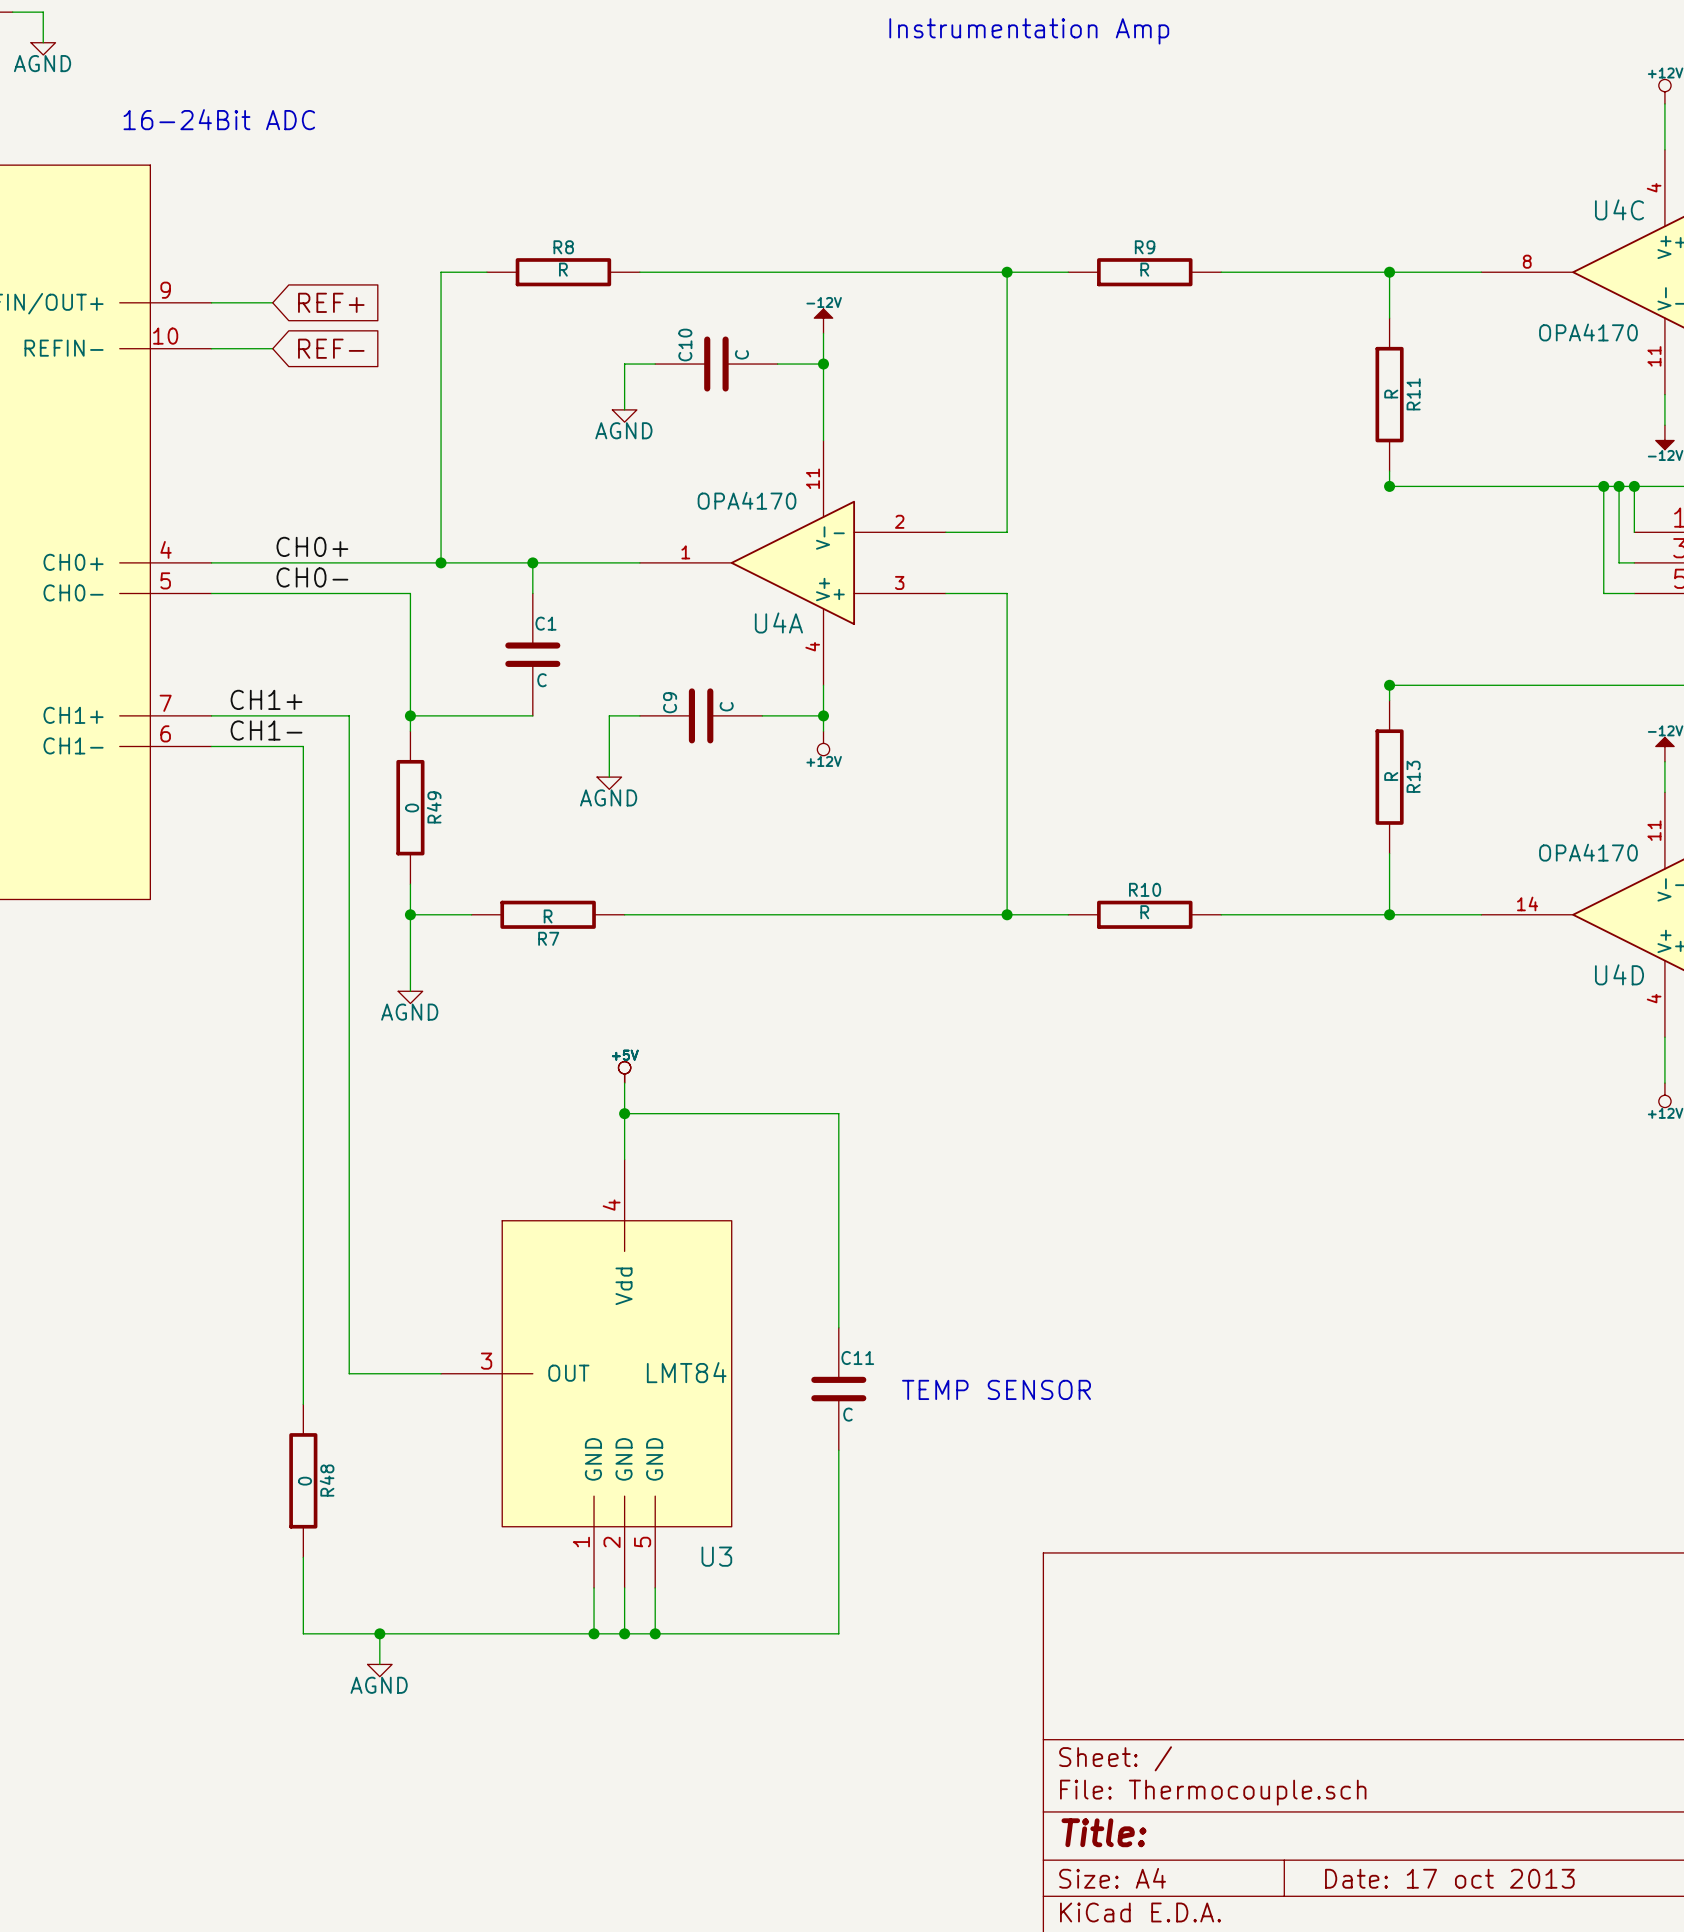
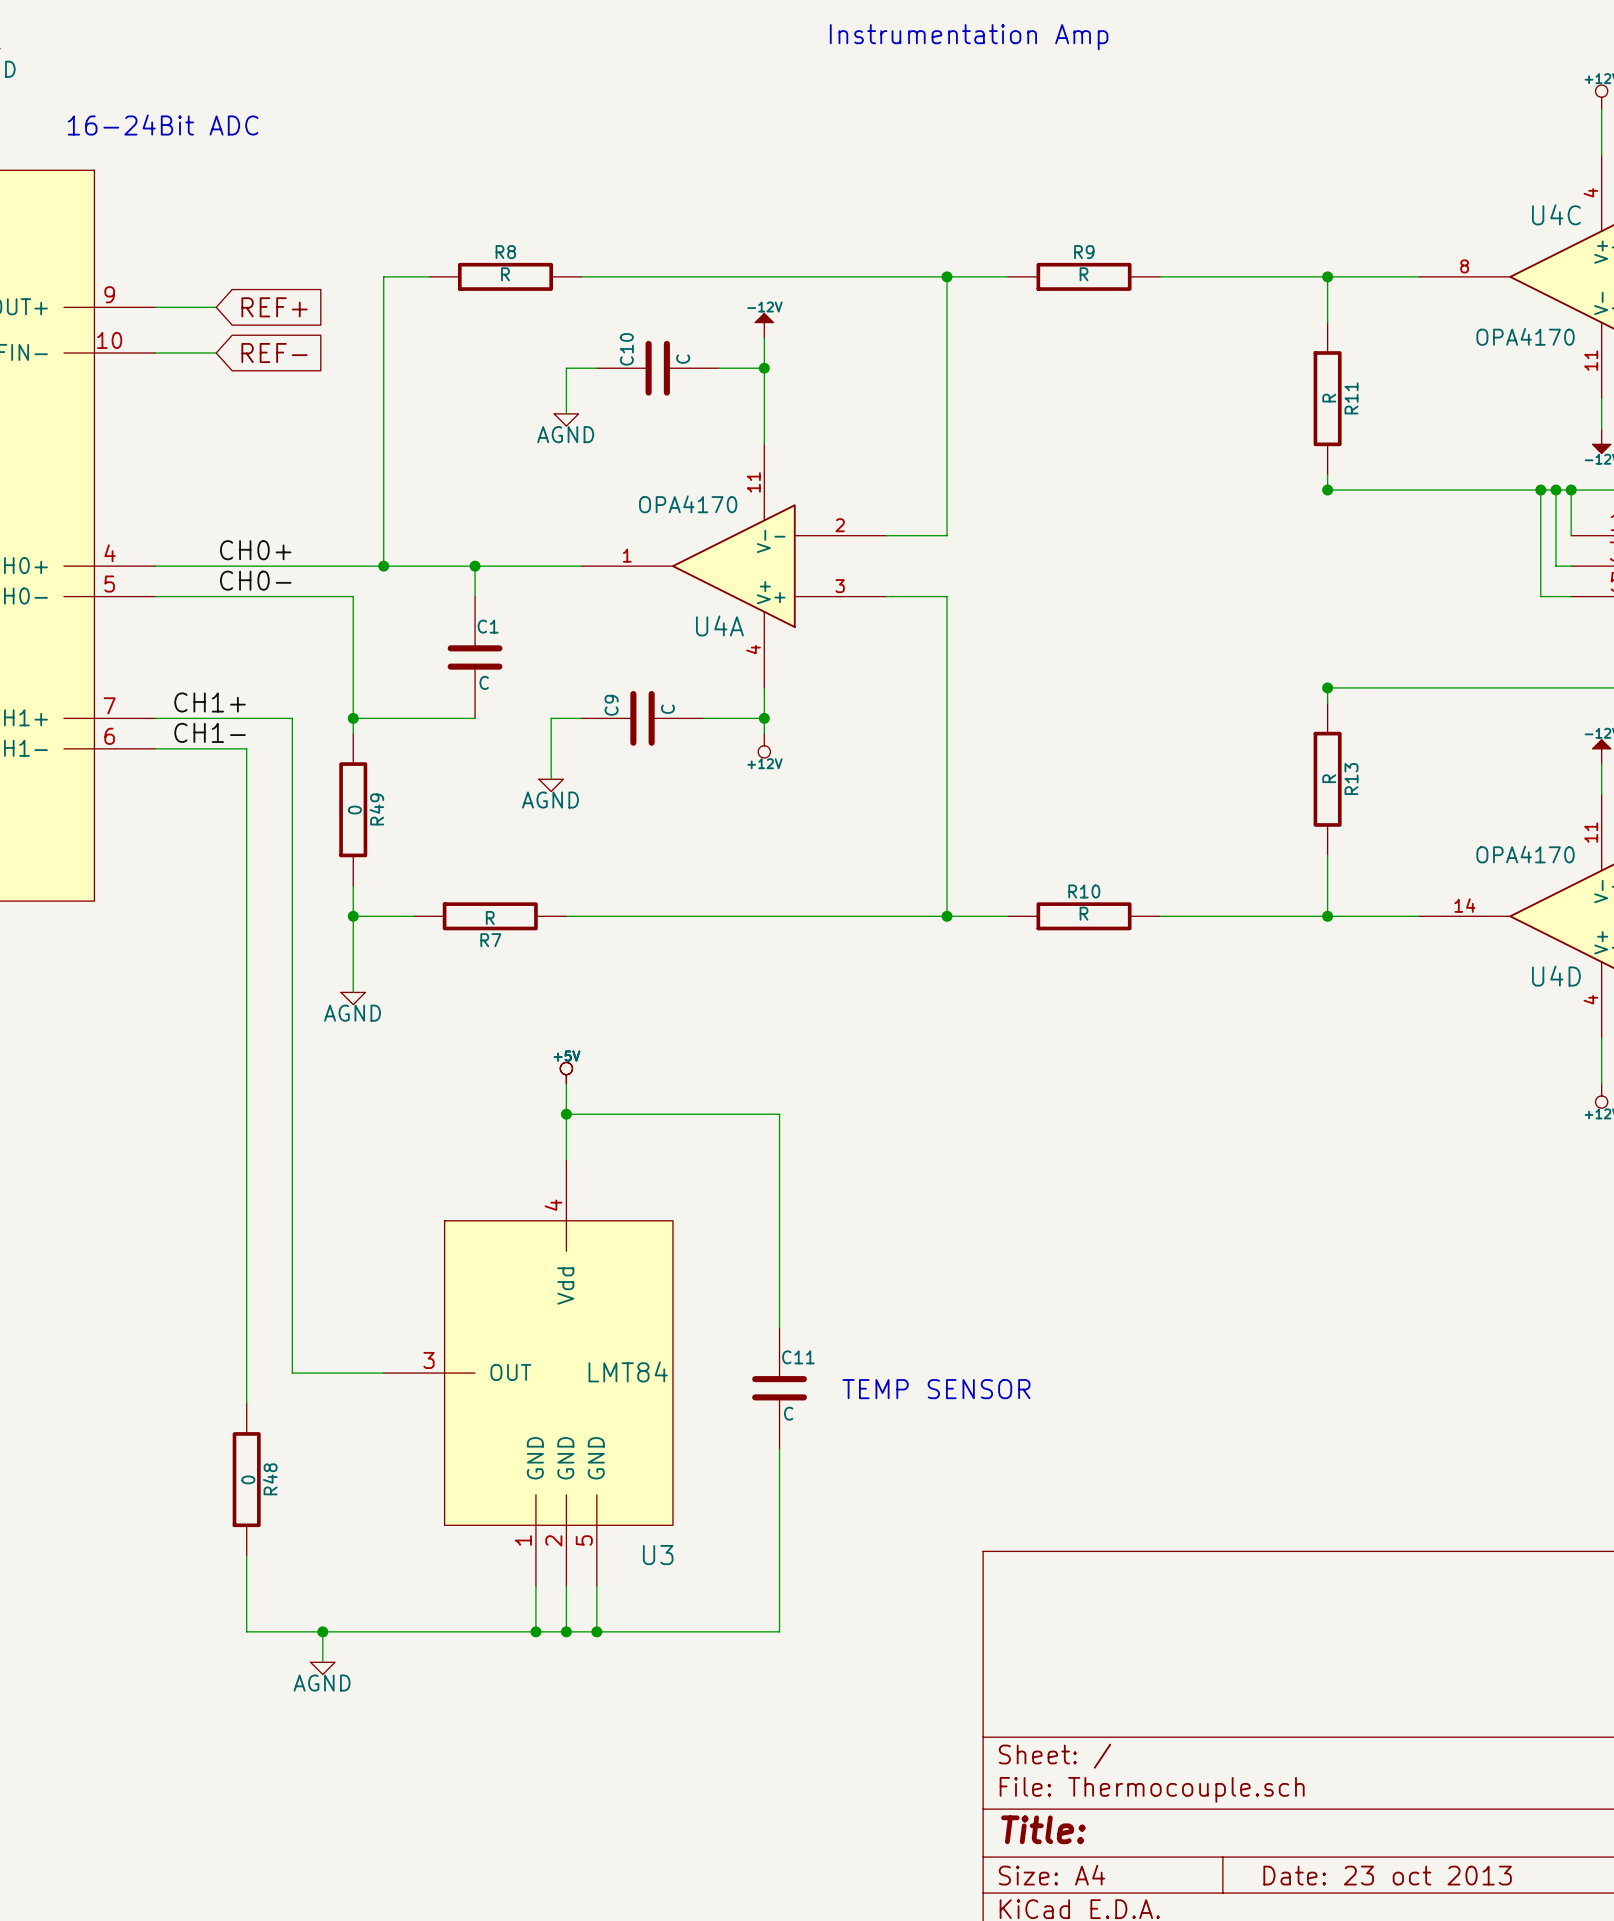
title block: Date: 17 oct 2013 (1449, 1878) -> Date: 23 oct 2013 (1387, 1875)

